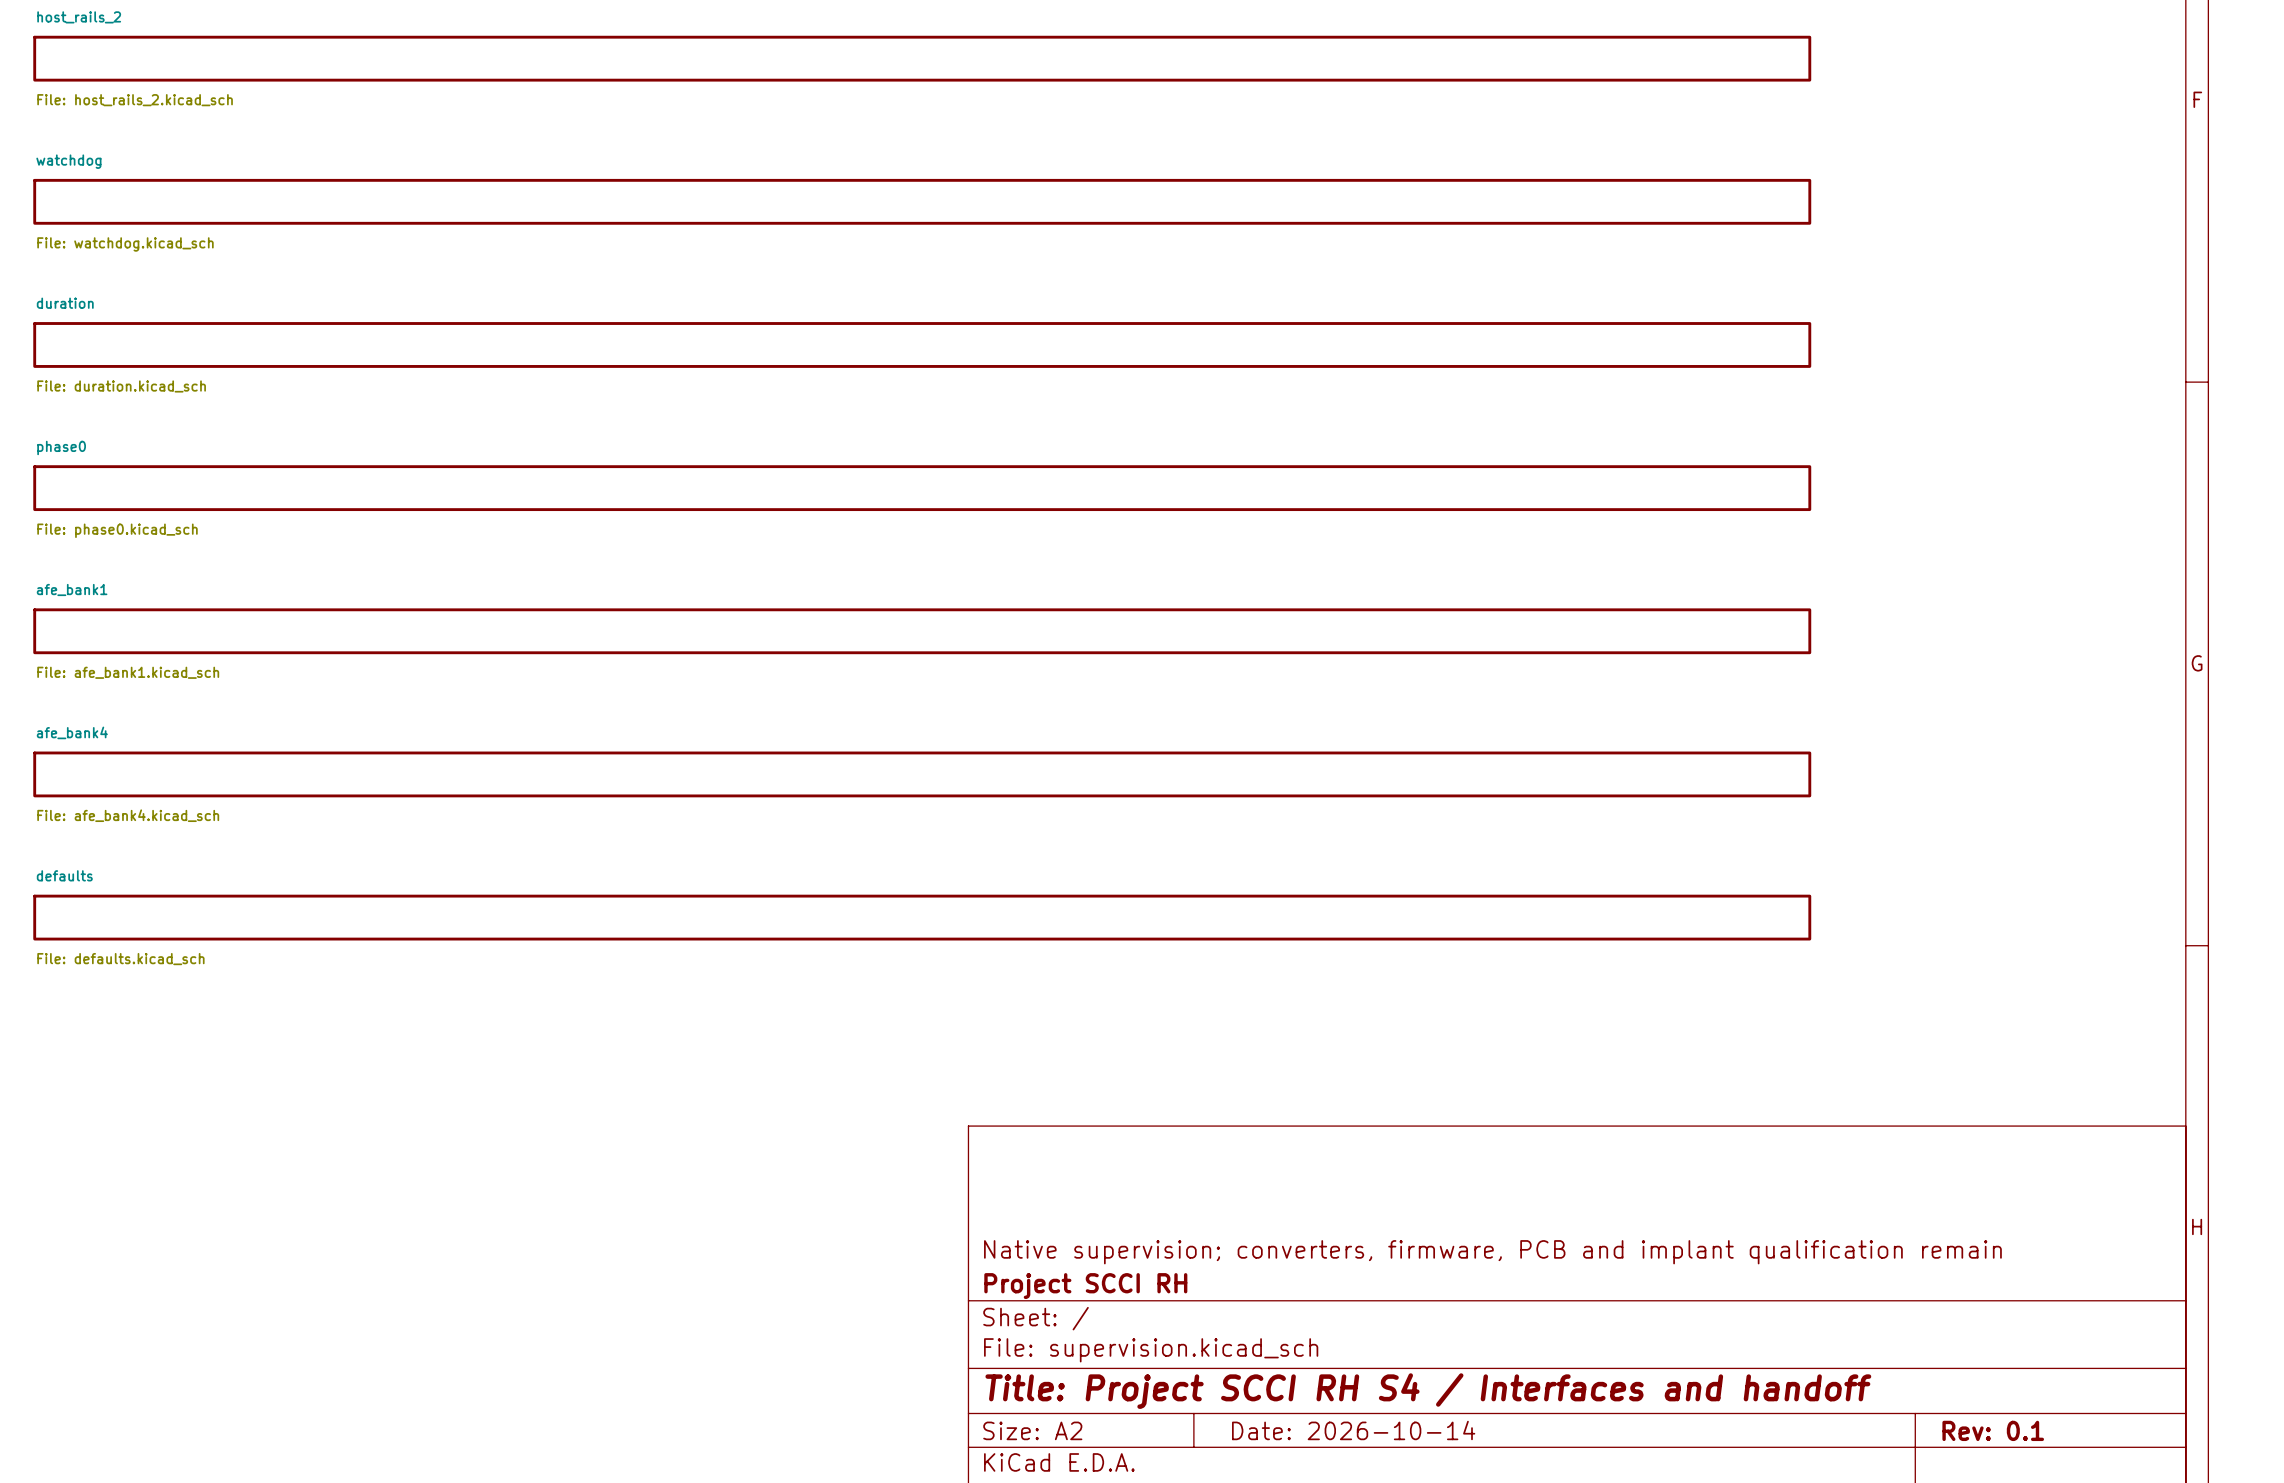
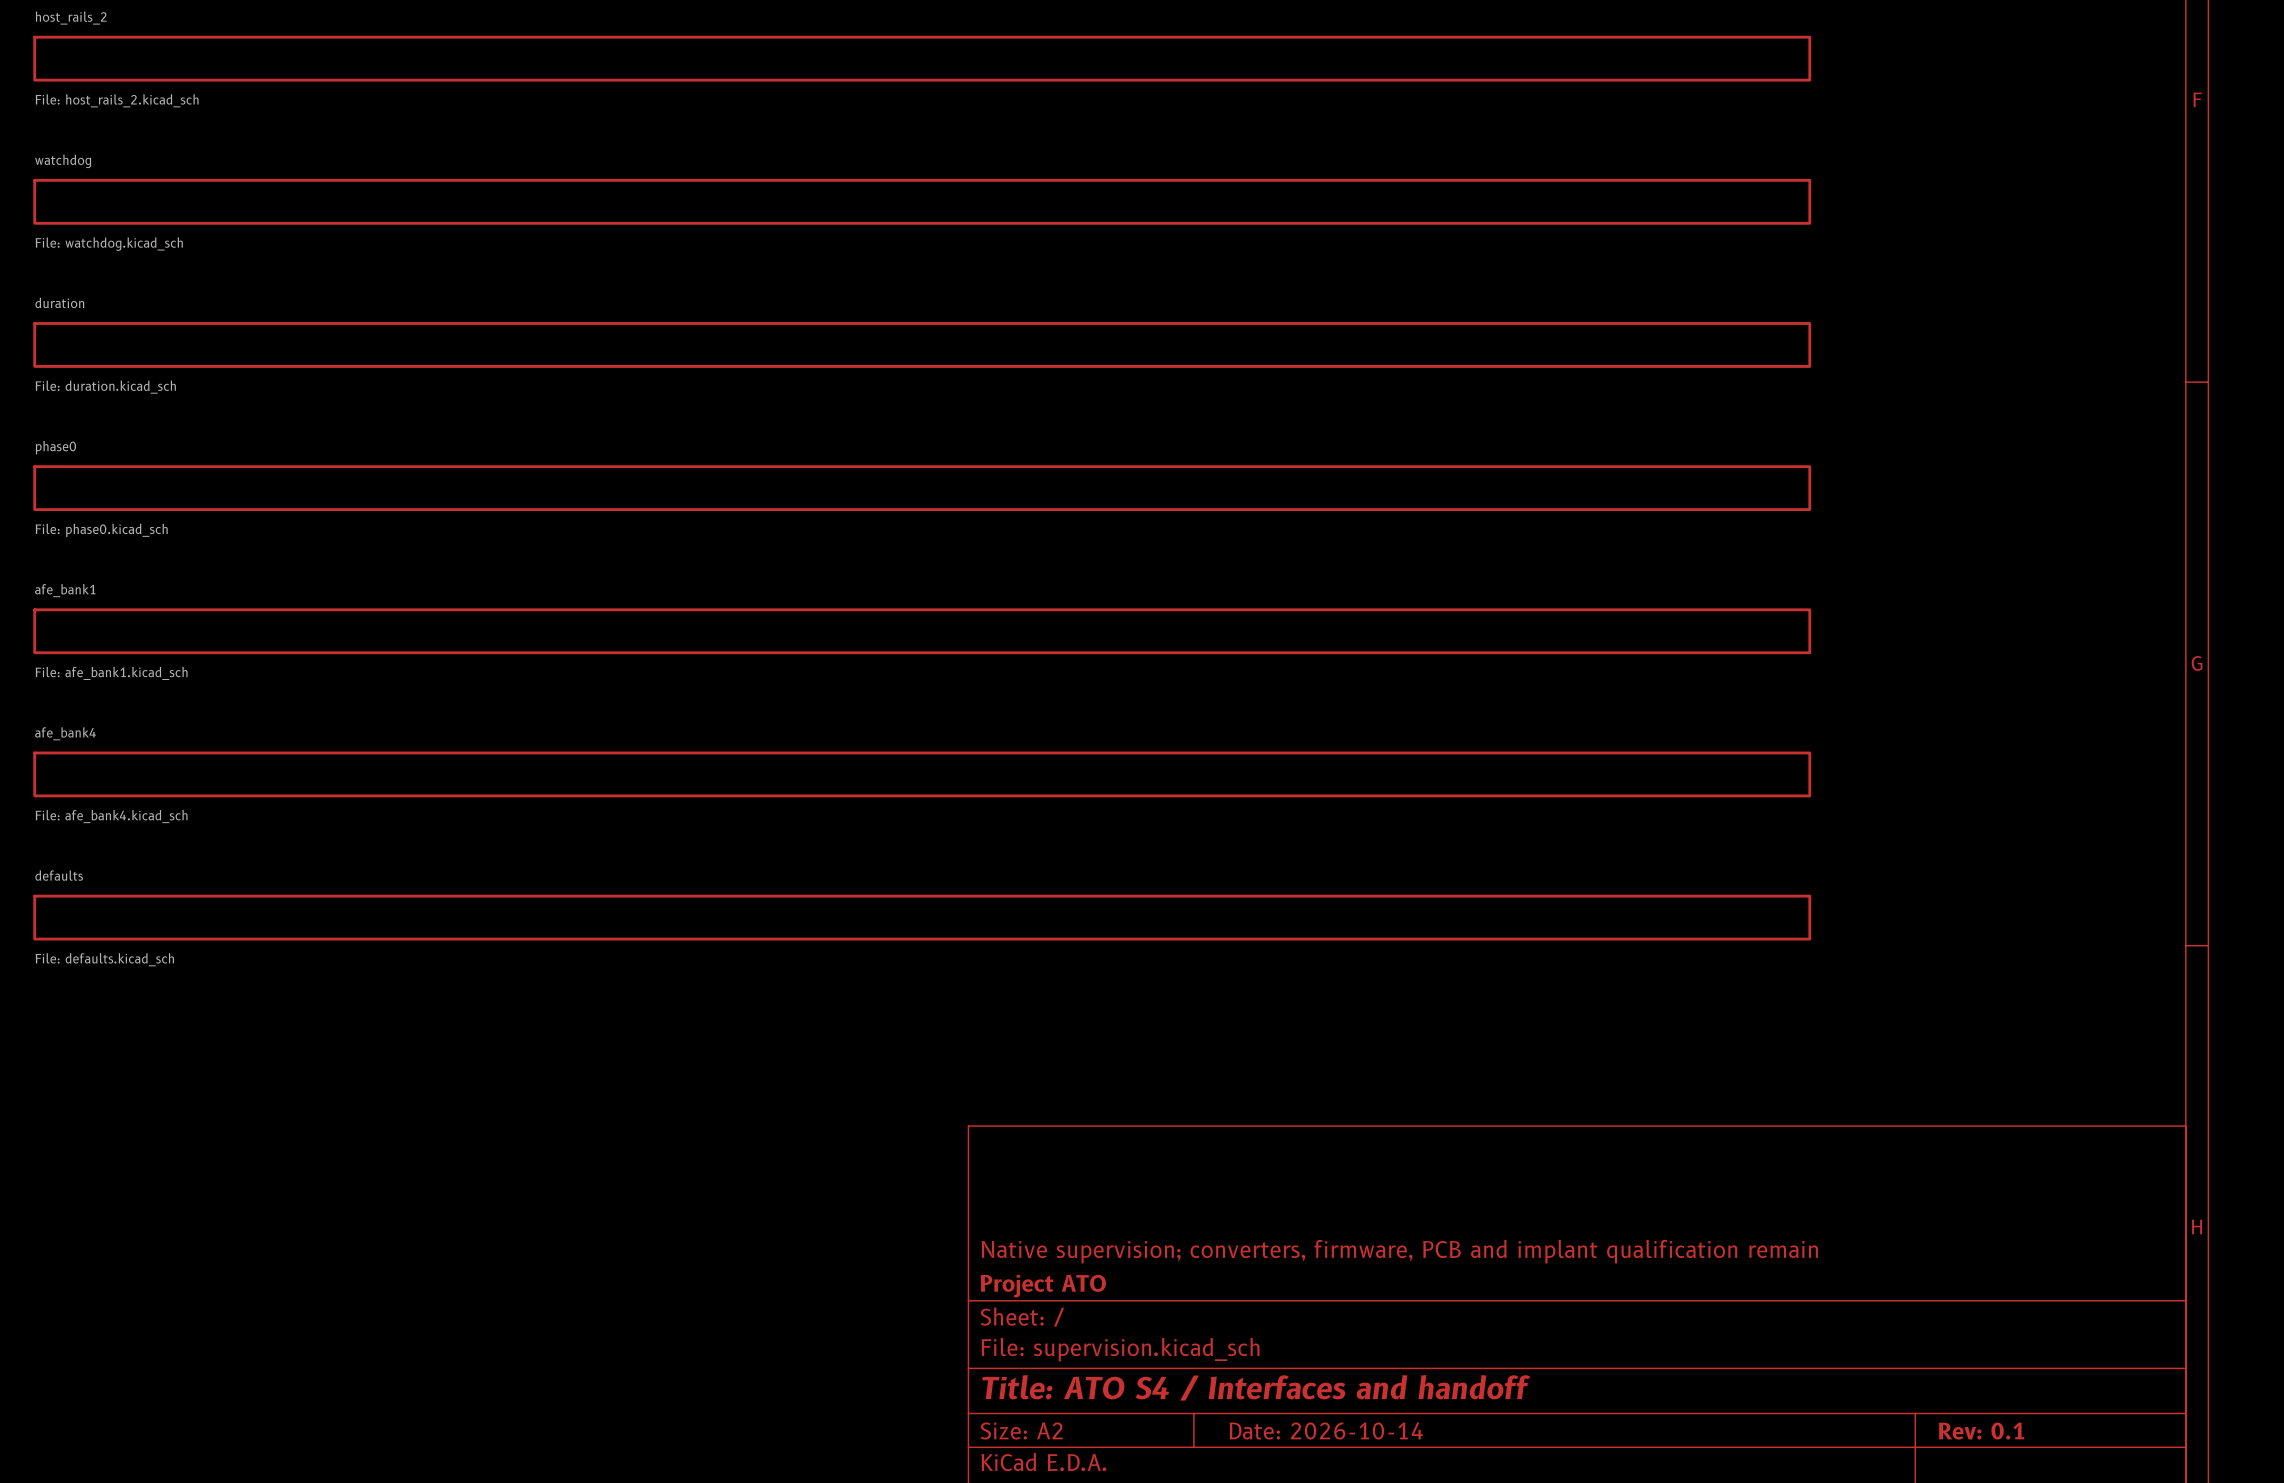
title block: Project SCCI RH (1085, 1286) -> Project ATO (1043, 1286)
title block: Title: Project SCCI RH S4 / Interfaces and handoff (1428, 1391) -> Title: ATO S4 / Interfaces and handoff (1256, 1387)

